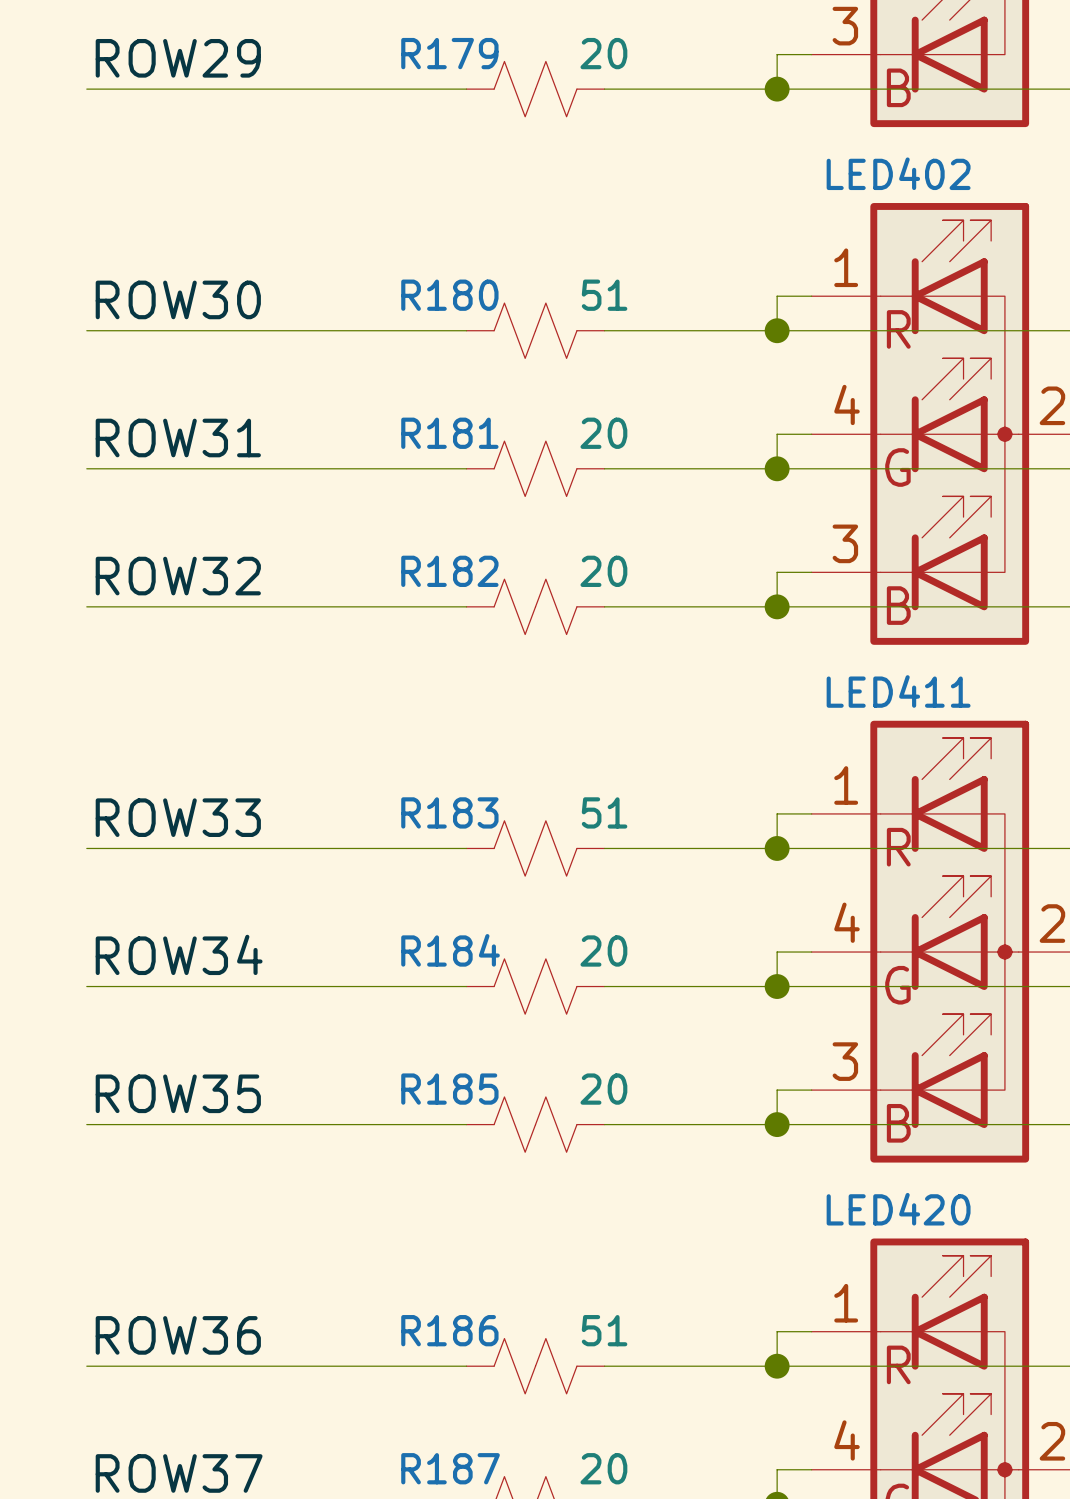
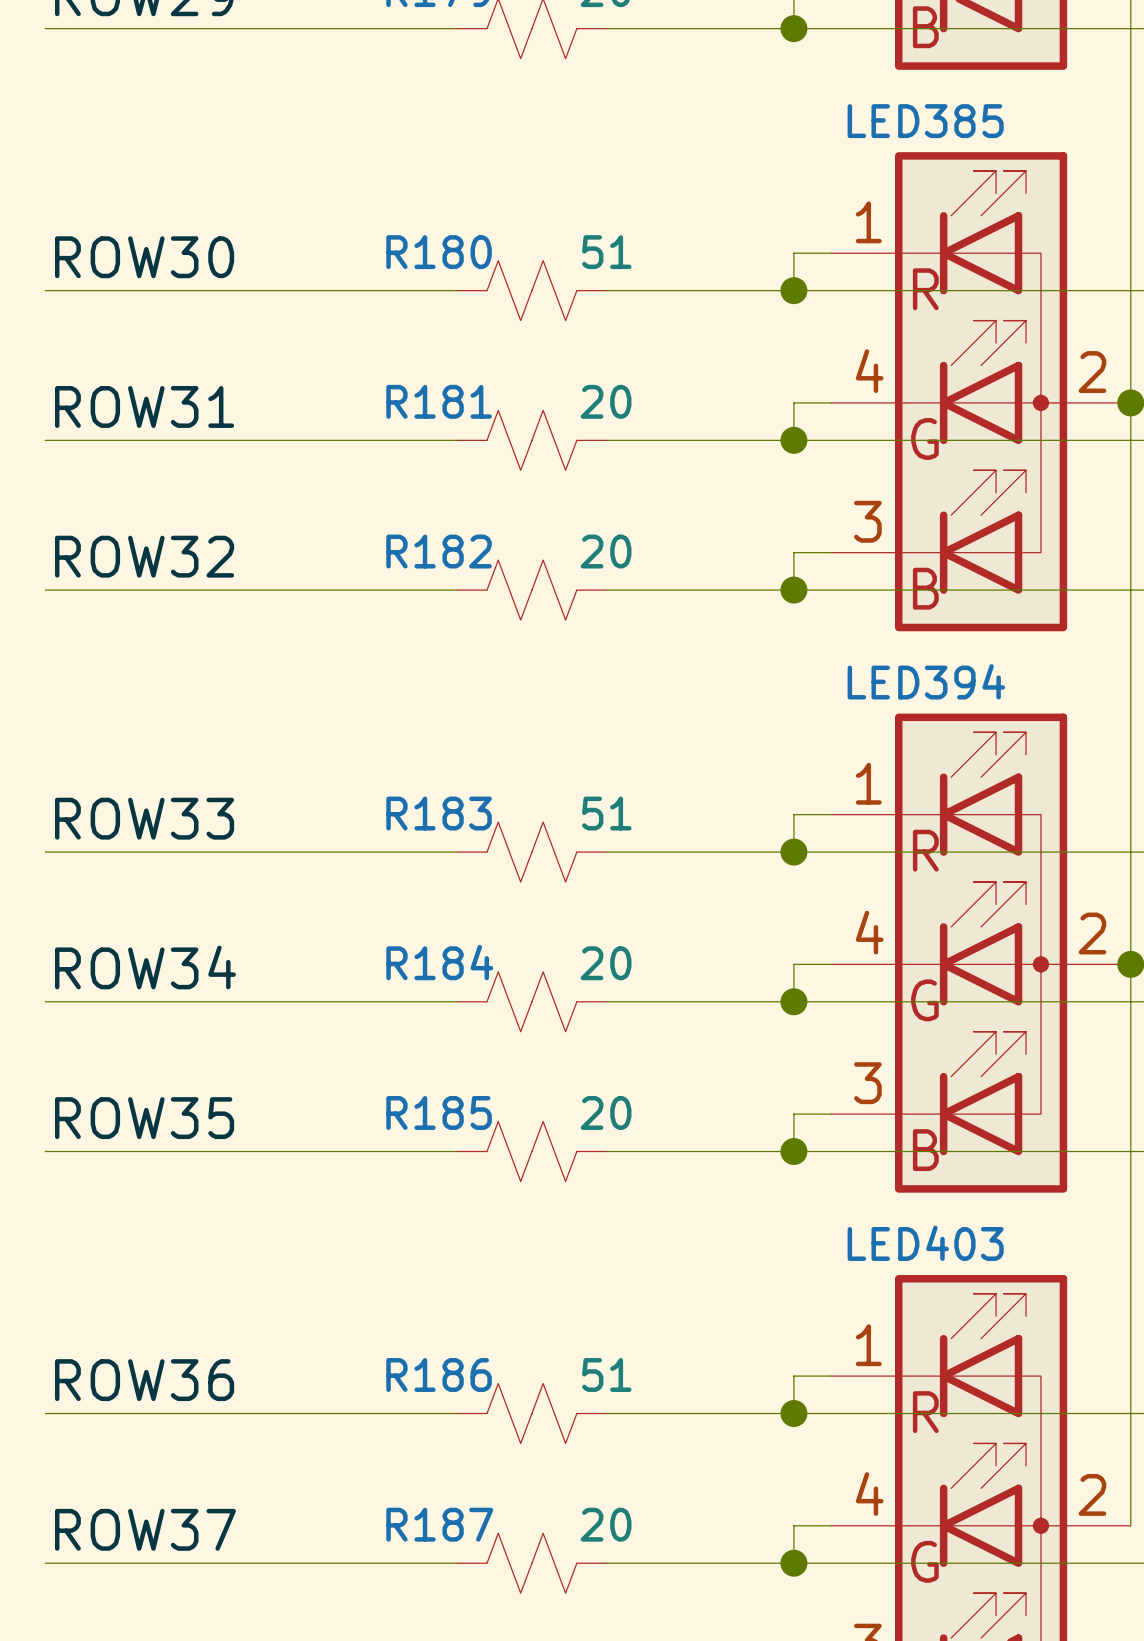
LED402 name: LED402 (898, 173) -> LED385 (925, 121)
LED411 name: LED411 (898, 691) -> LED394 (926, 681)
LED420 name: LED420 (898, 1209) -> LED403 (925, 1243)

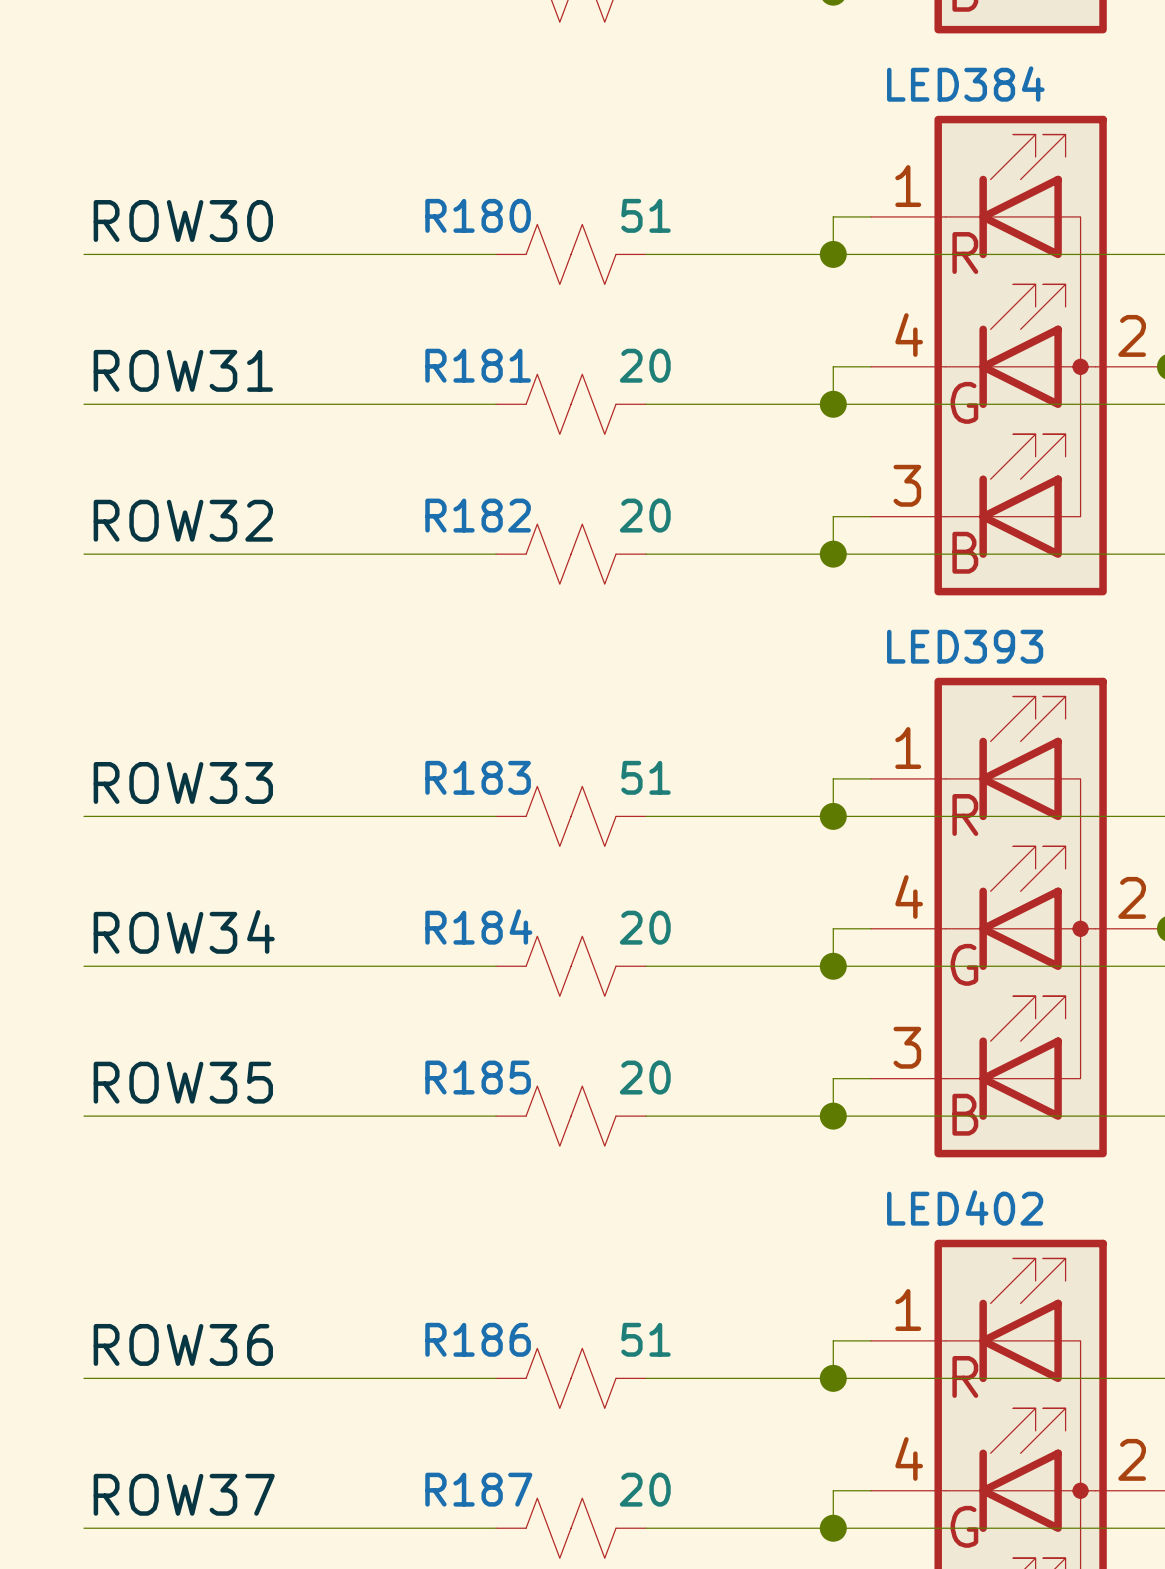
LED385 name: LED385 (925, 121) -> LED384 (965, 84)
LED394 name: LED394 (926, 681) -> LED393 (965, 646)
LED403 name: LED403 (925, 1243) -> LED402 (965, 1207)

